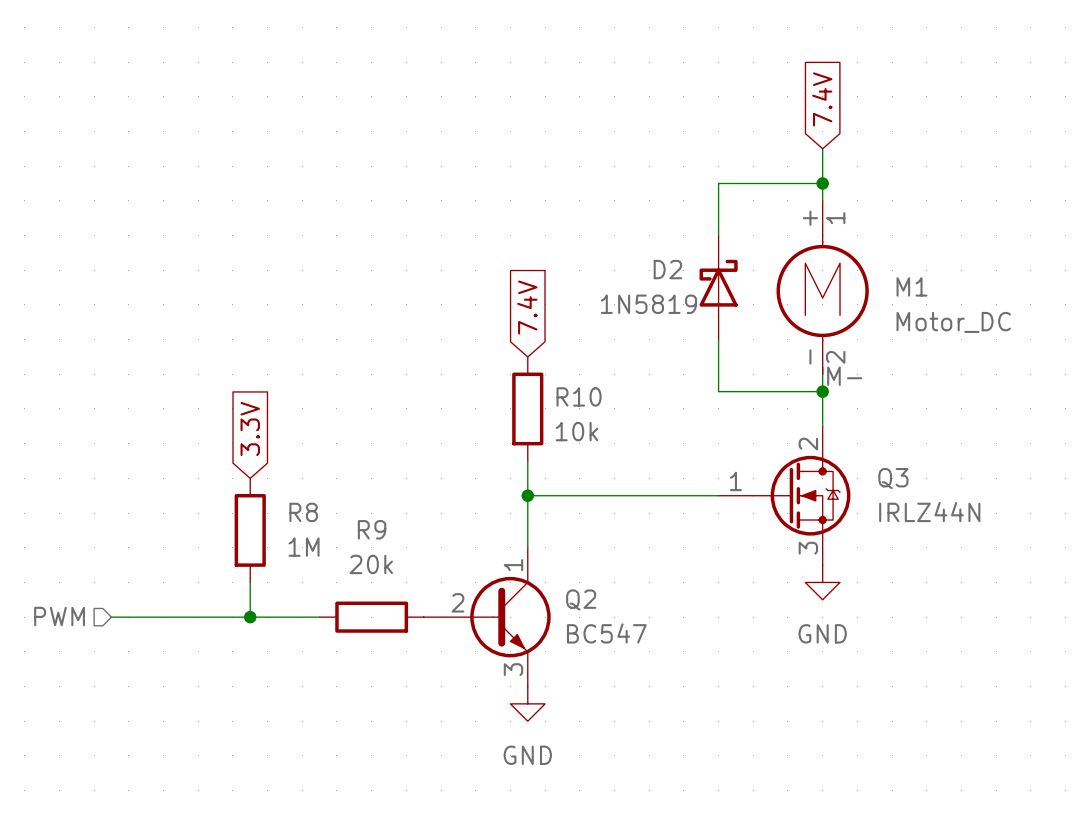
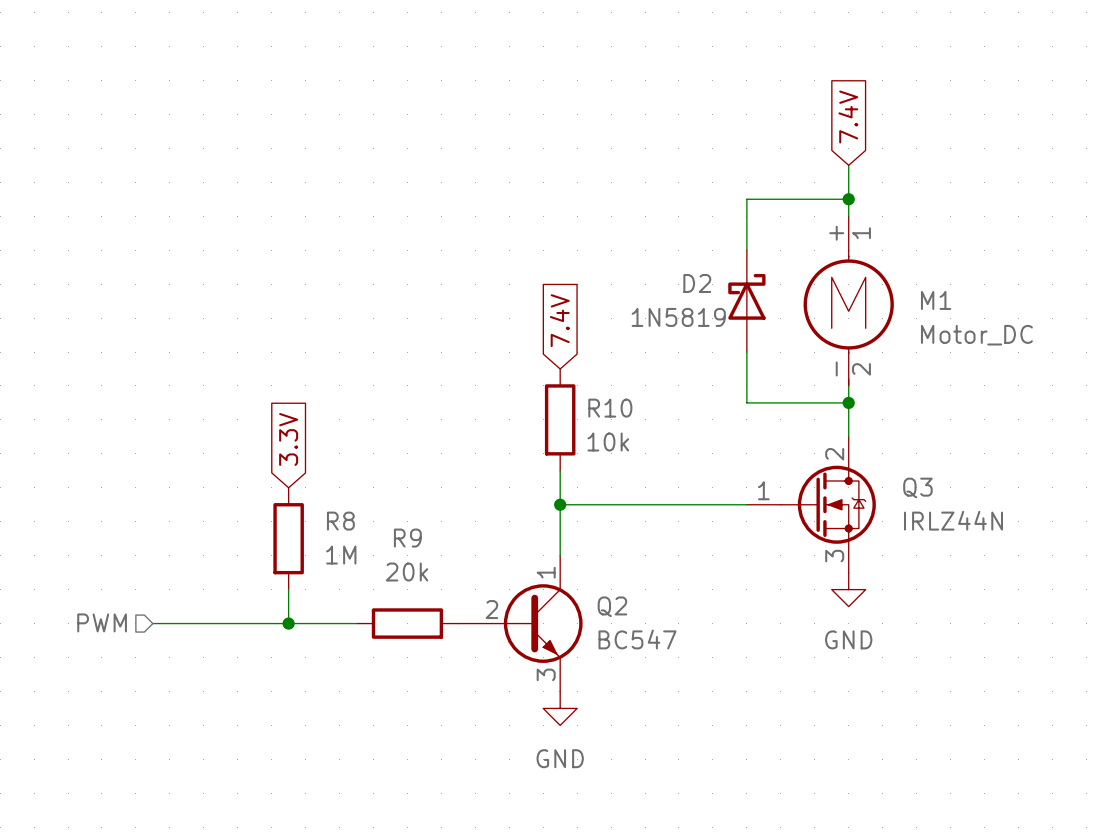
label: M- (844, 376) -> none

